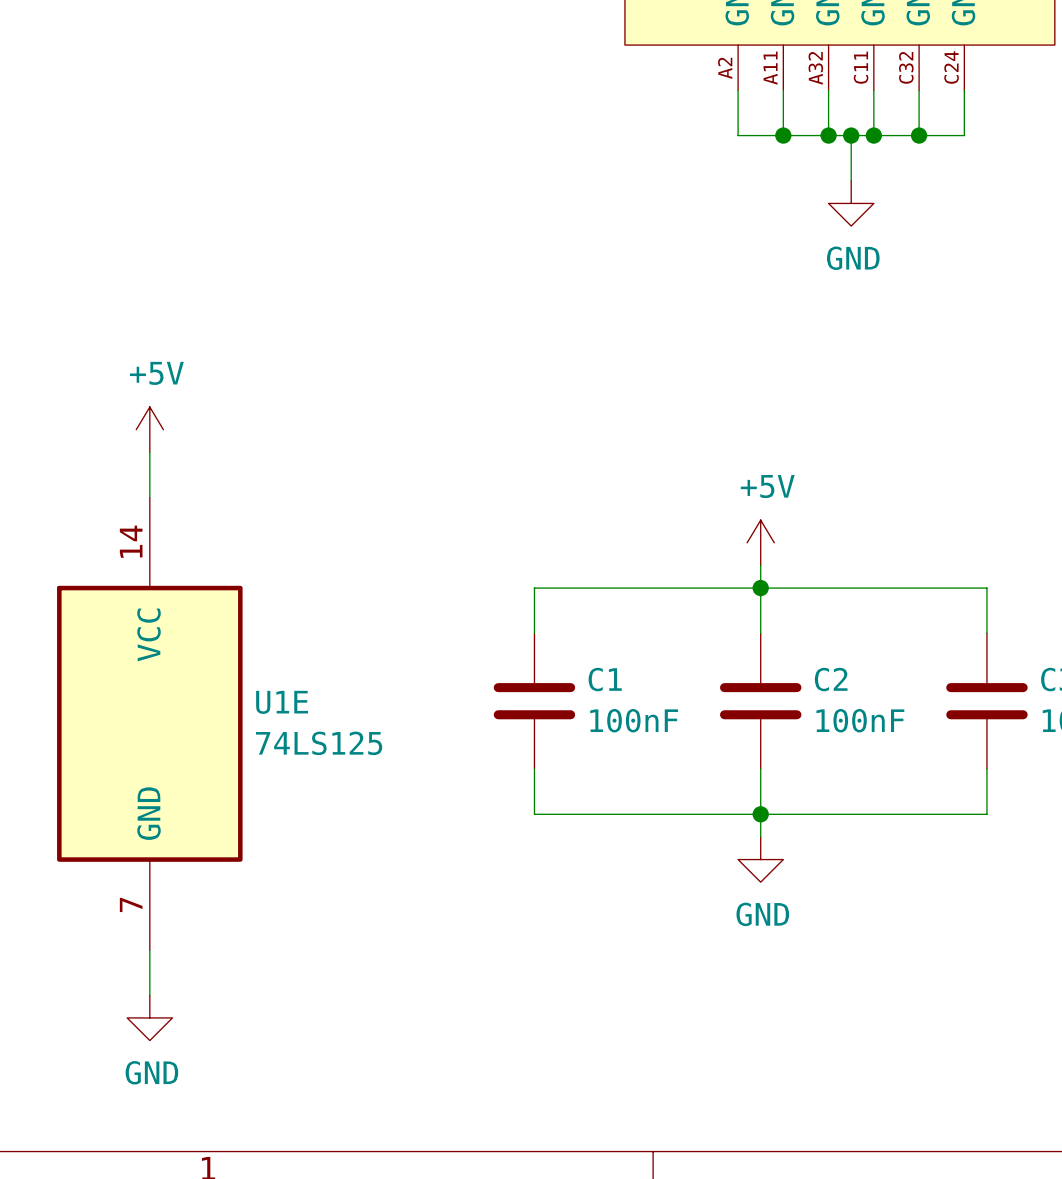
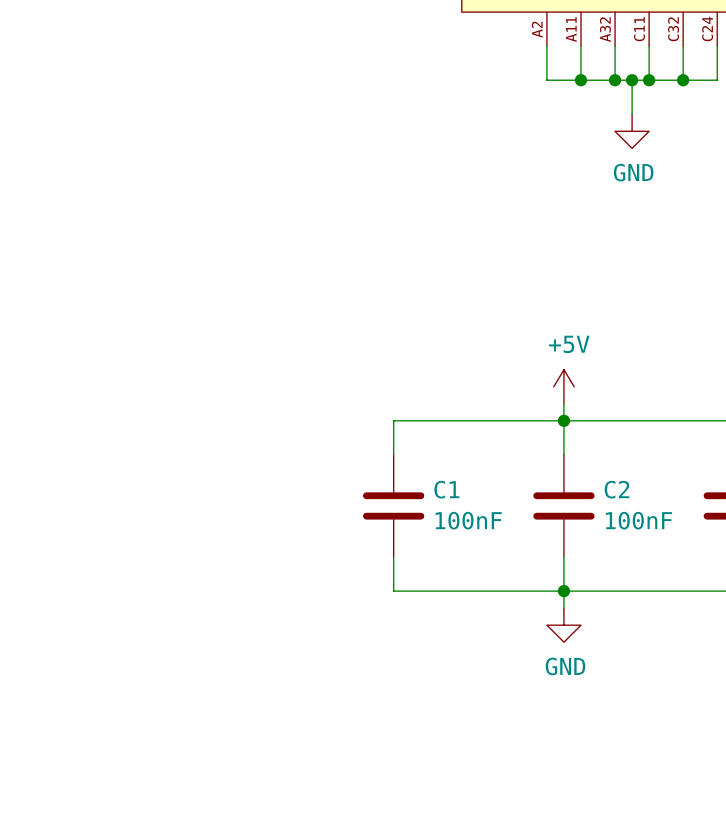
power symbol: +5V (149, 429) -> none
wire: (149, 452) (149, 497) -> none
U1E: 74LS125 (149, 723) -> none
wire: (149, 950) (149, 995) -> none
power symbol: GND (149, 1017) -> none

